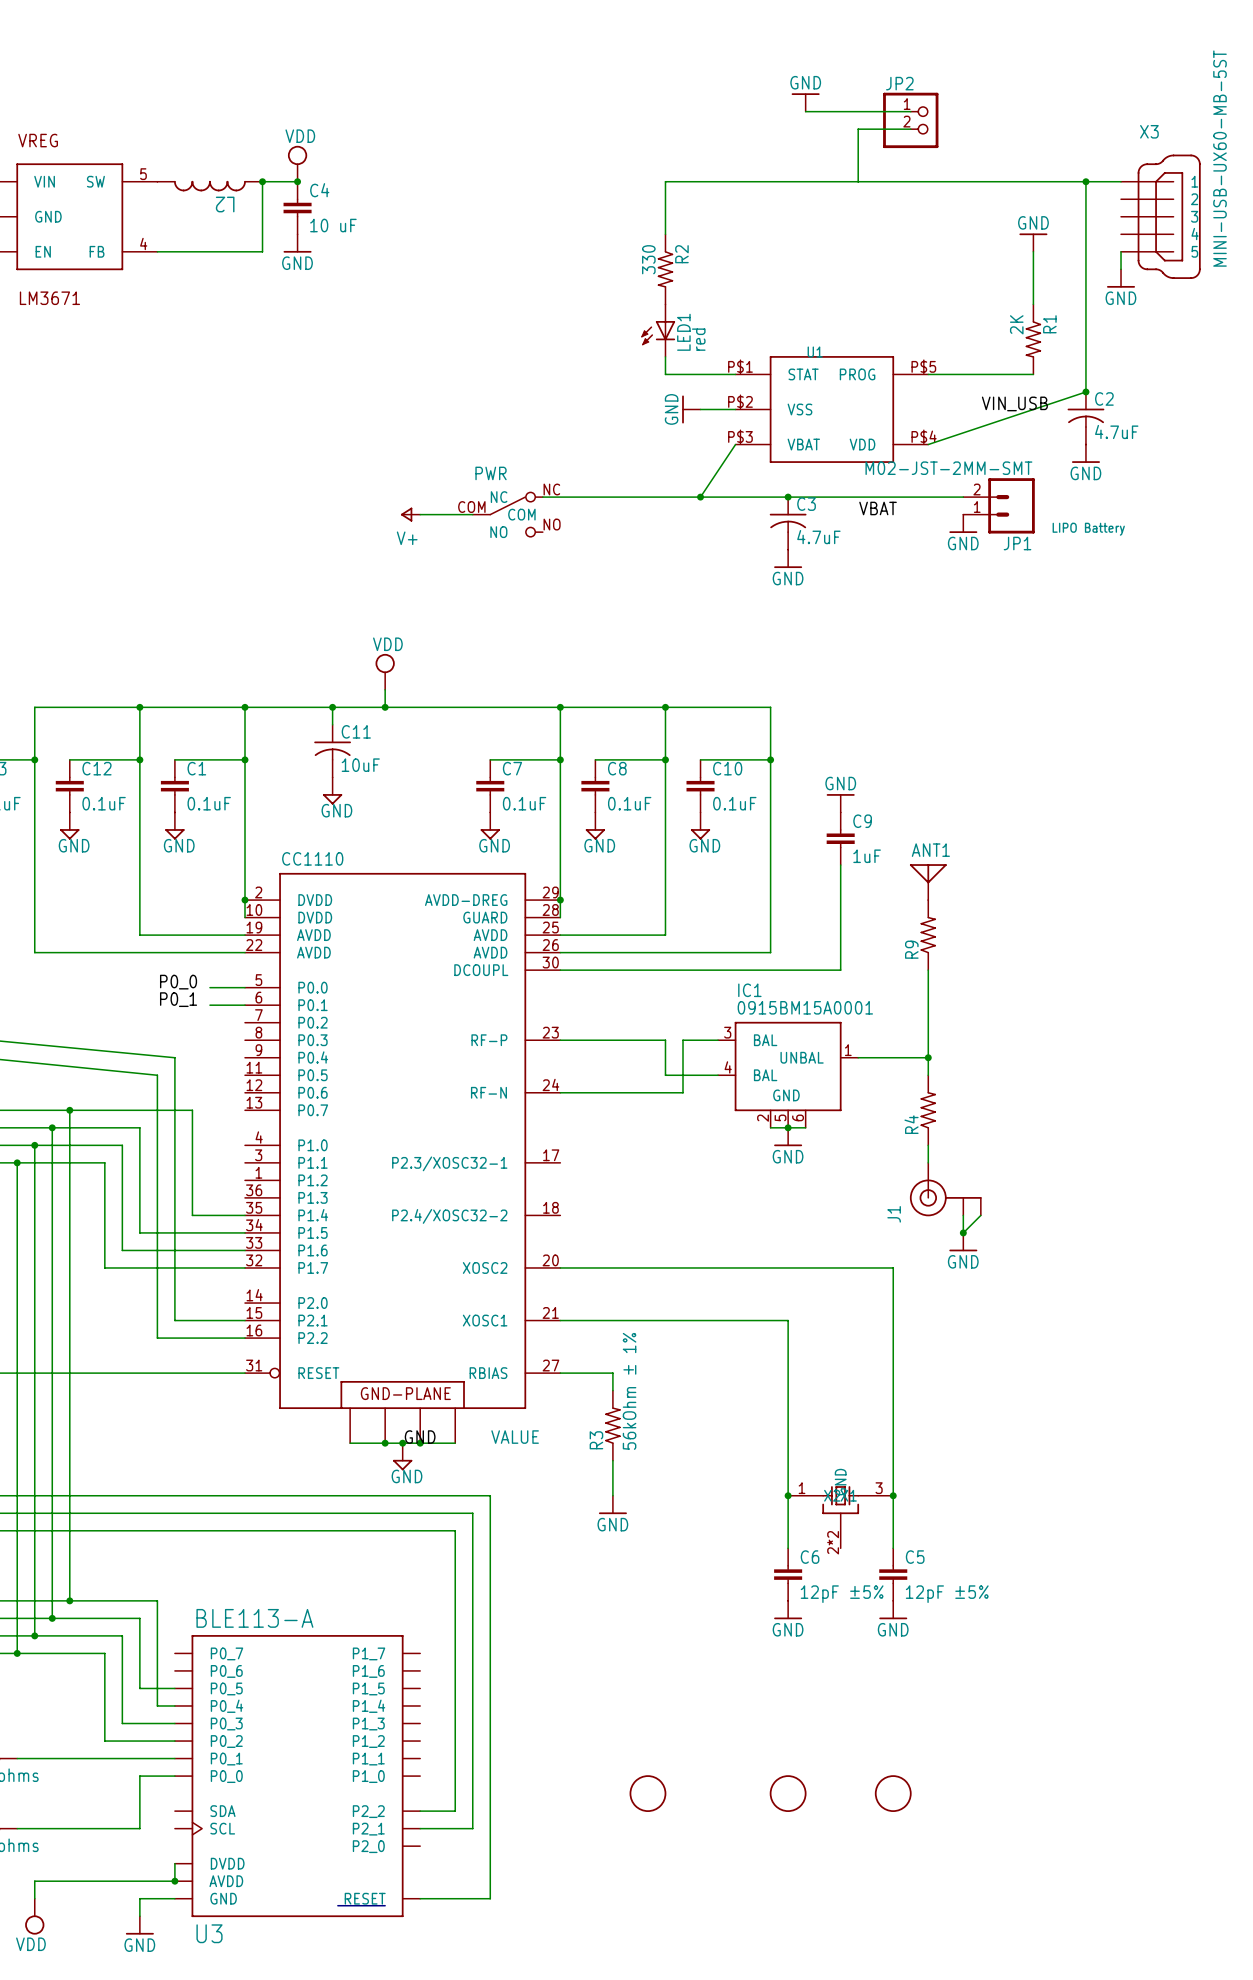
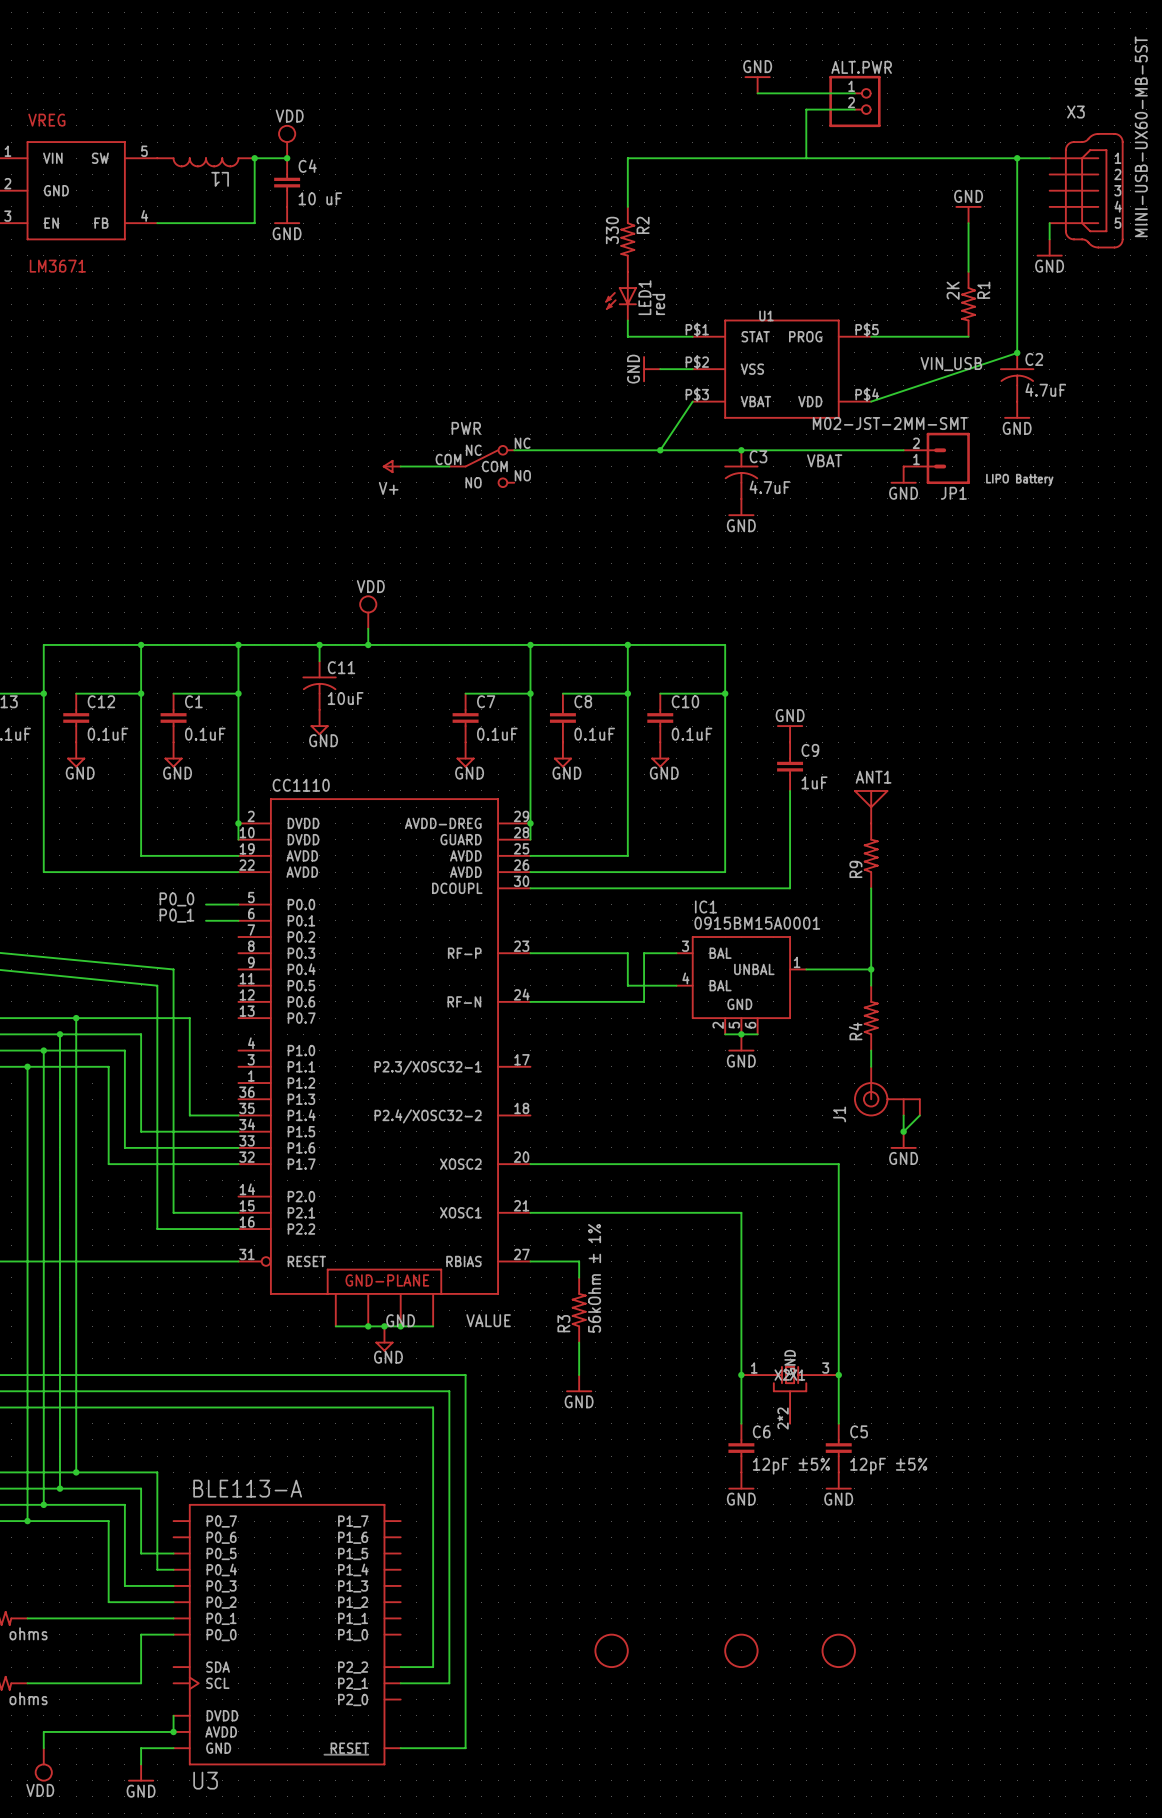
JP2 name: JP2 (899, 83) -> ALT.PWR (861, 67)
L2 name: L2 (225, 204) -> L1 (220, 179)

